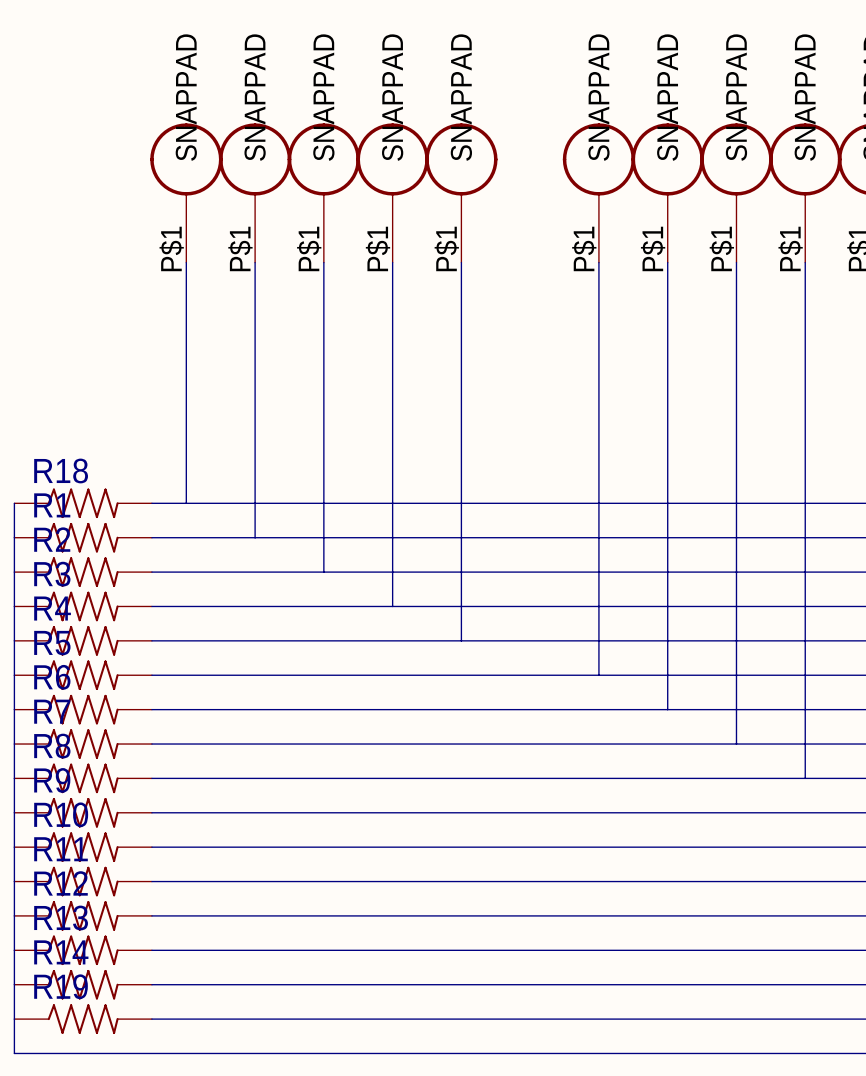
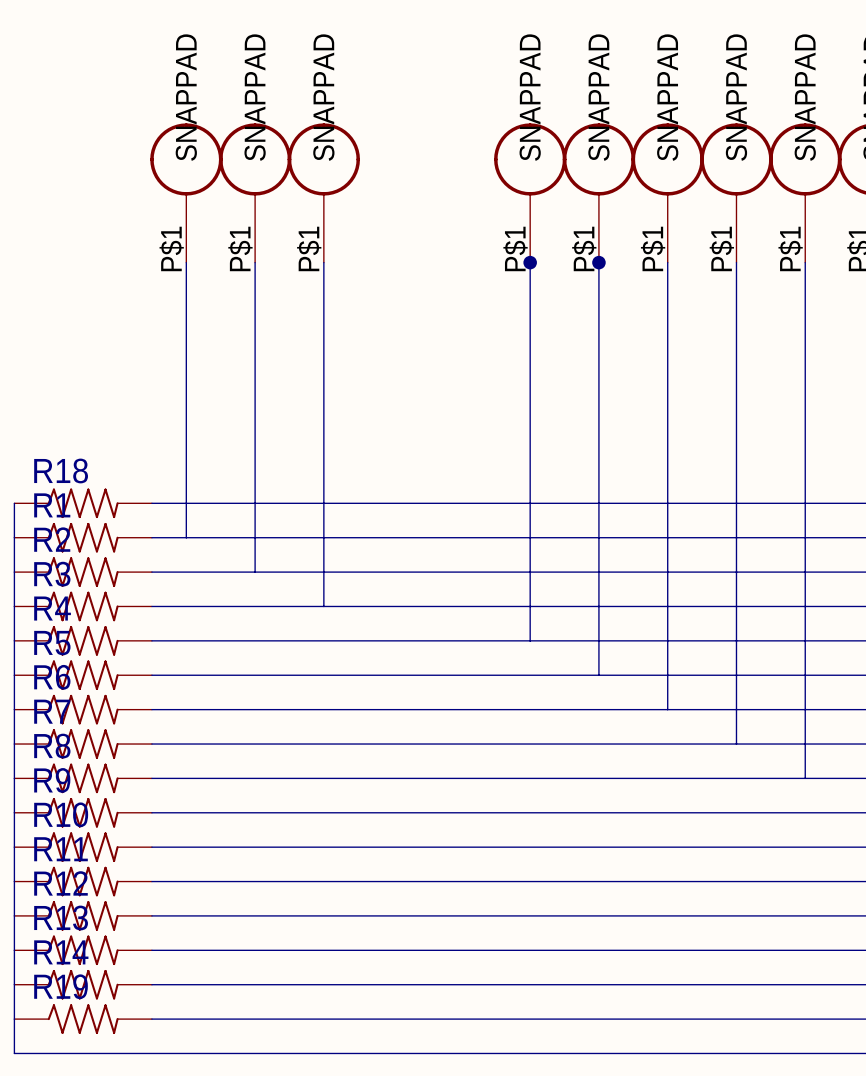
part: (392, 192) -> none
part: (461, 192) -> none
part: none -> (530, 192)
wire: (392, 262) (392, 606) -> none
wire: (461, 262) (461, 640) -> (530, 262) (530, 640)
junction: none -> (530, 262)
junction: none -> (598, 262)
wire: none -> (186, 503) (186, 537)
wire: none -> (255, 537) (255, 572)
wire: none -> (323, 572) (323, 606)

